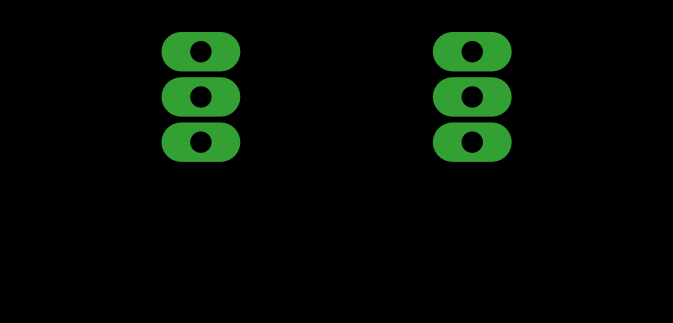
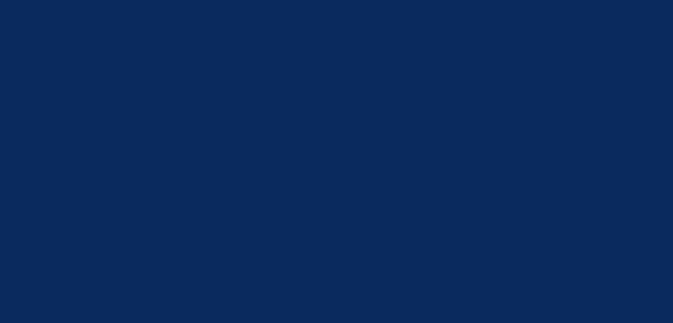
part: (200, 96) -> none
part: (472, 96) -> none

